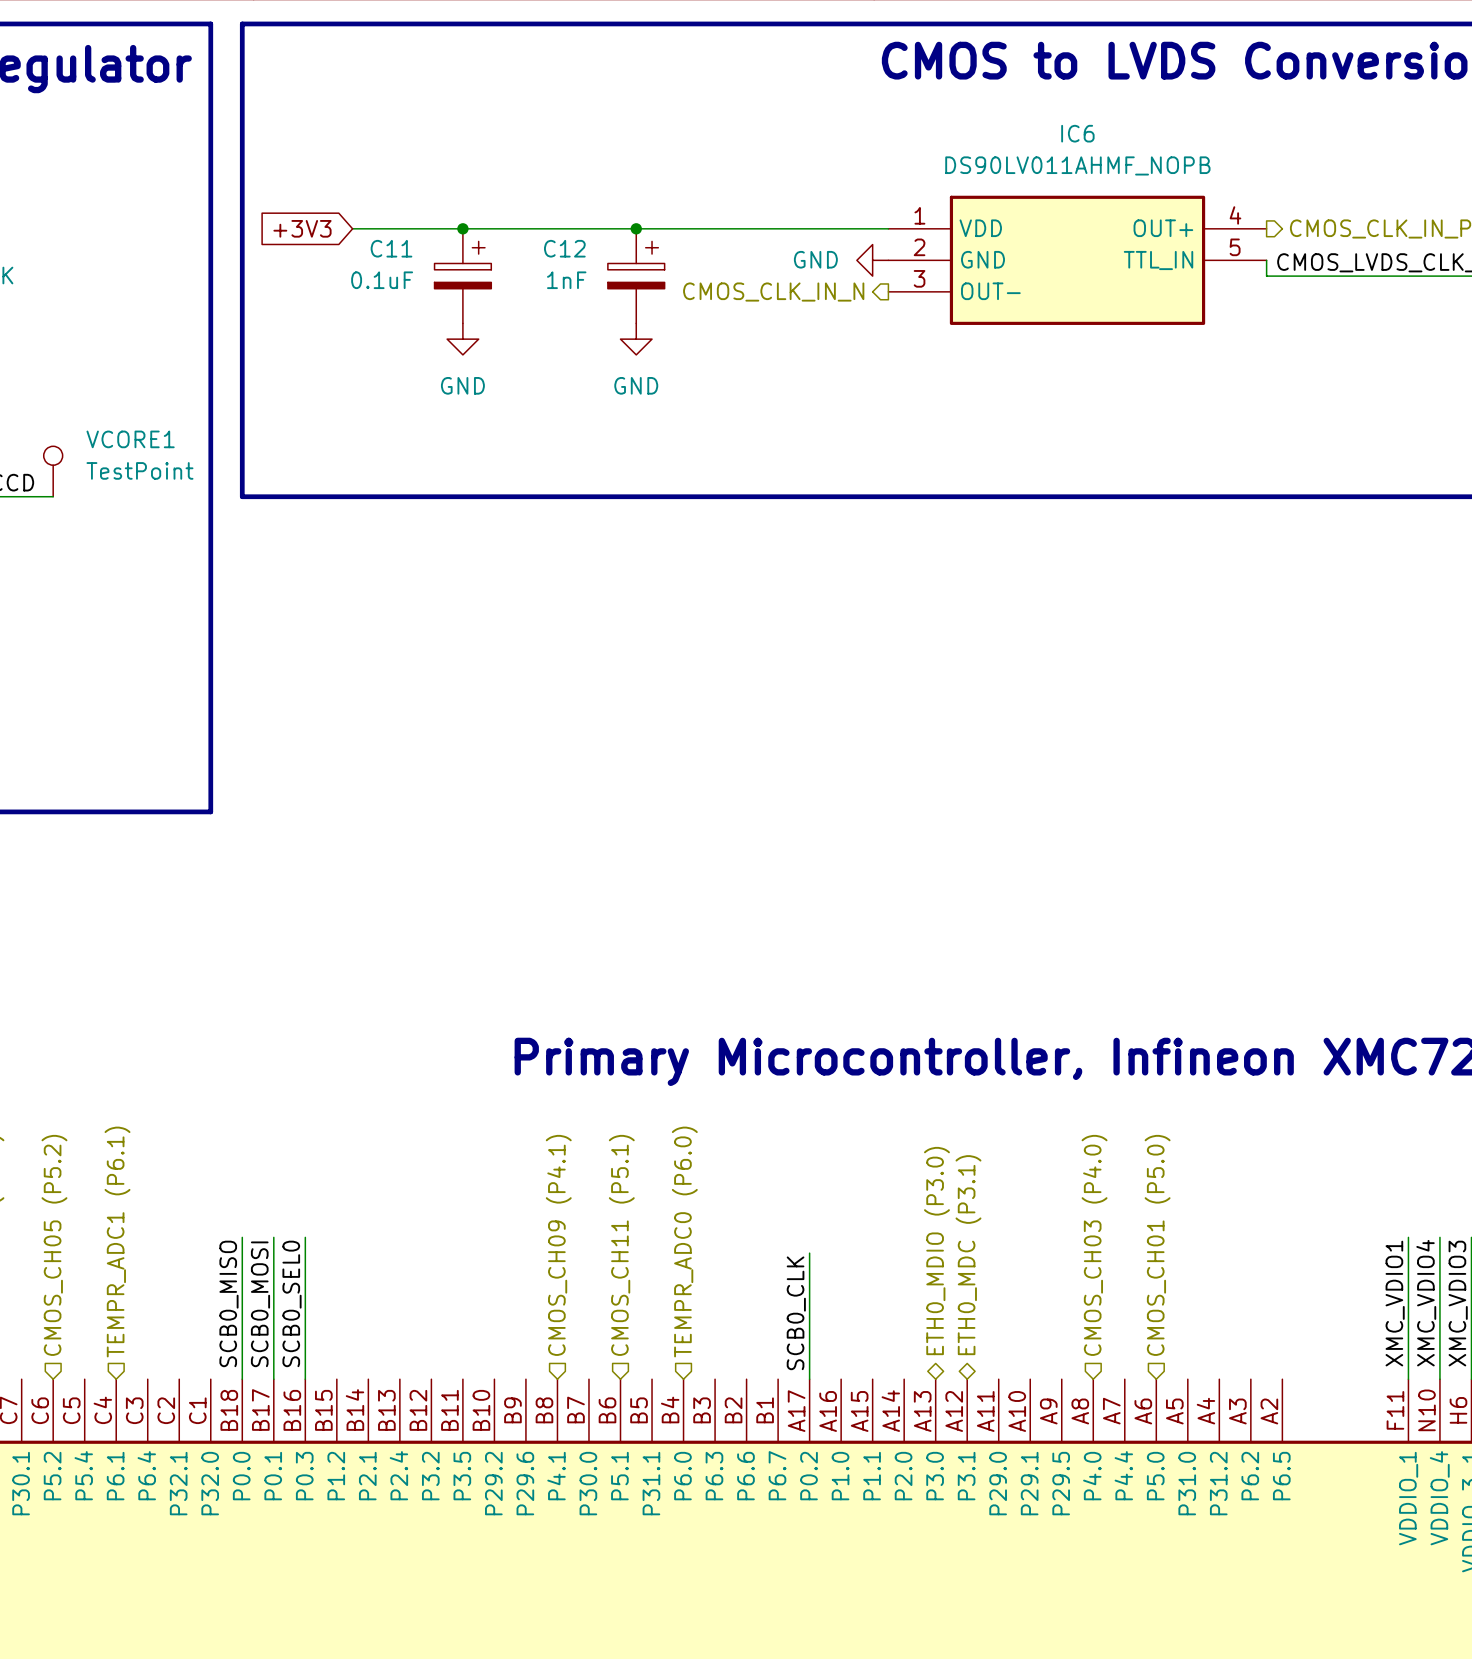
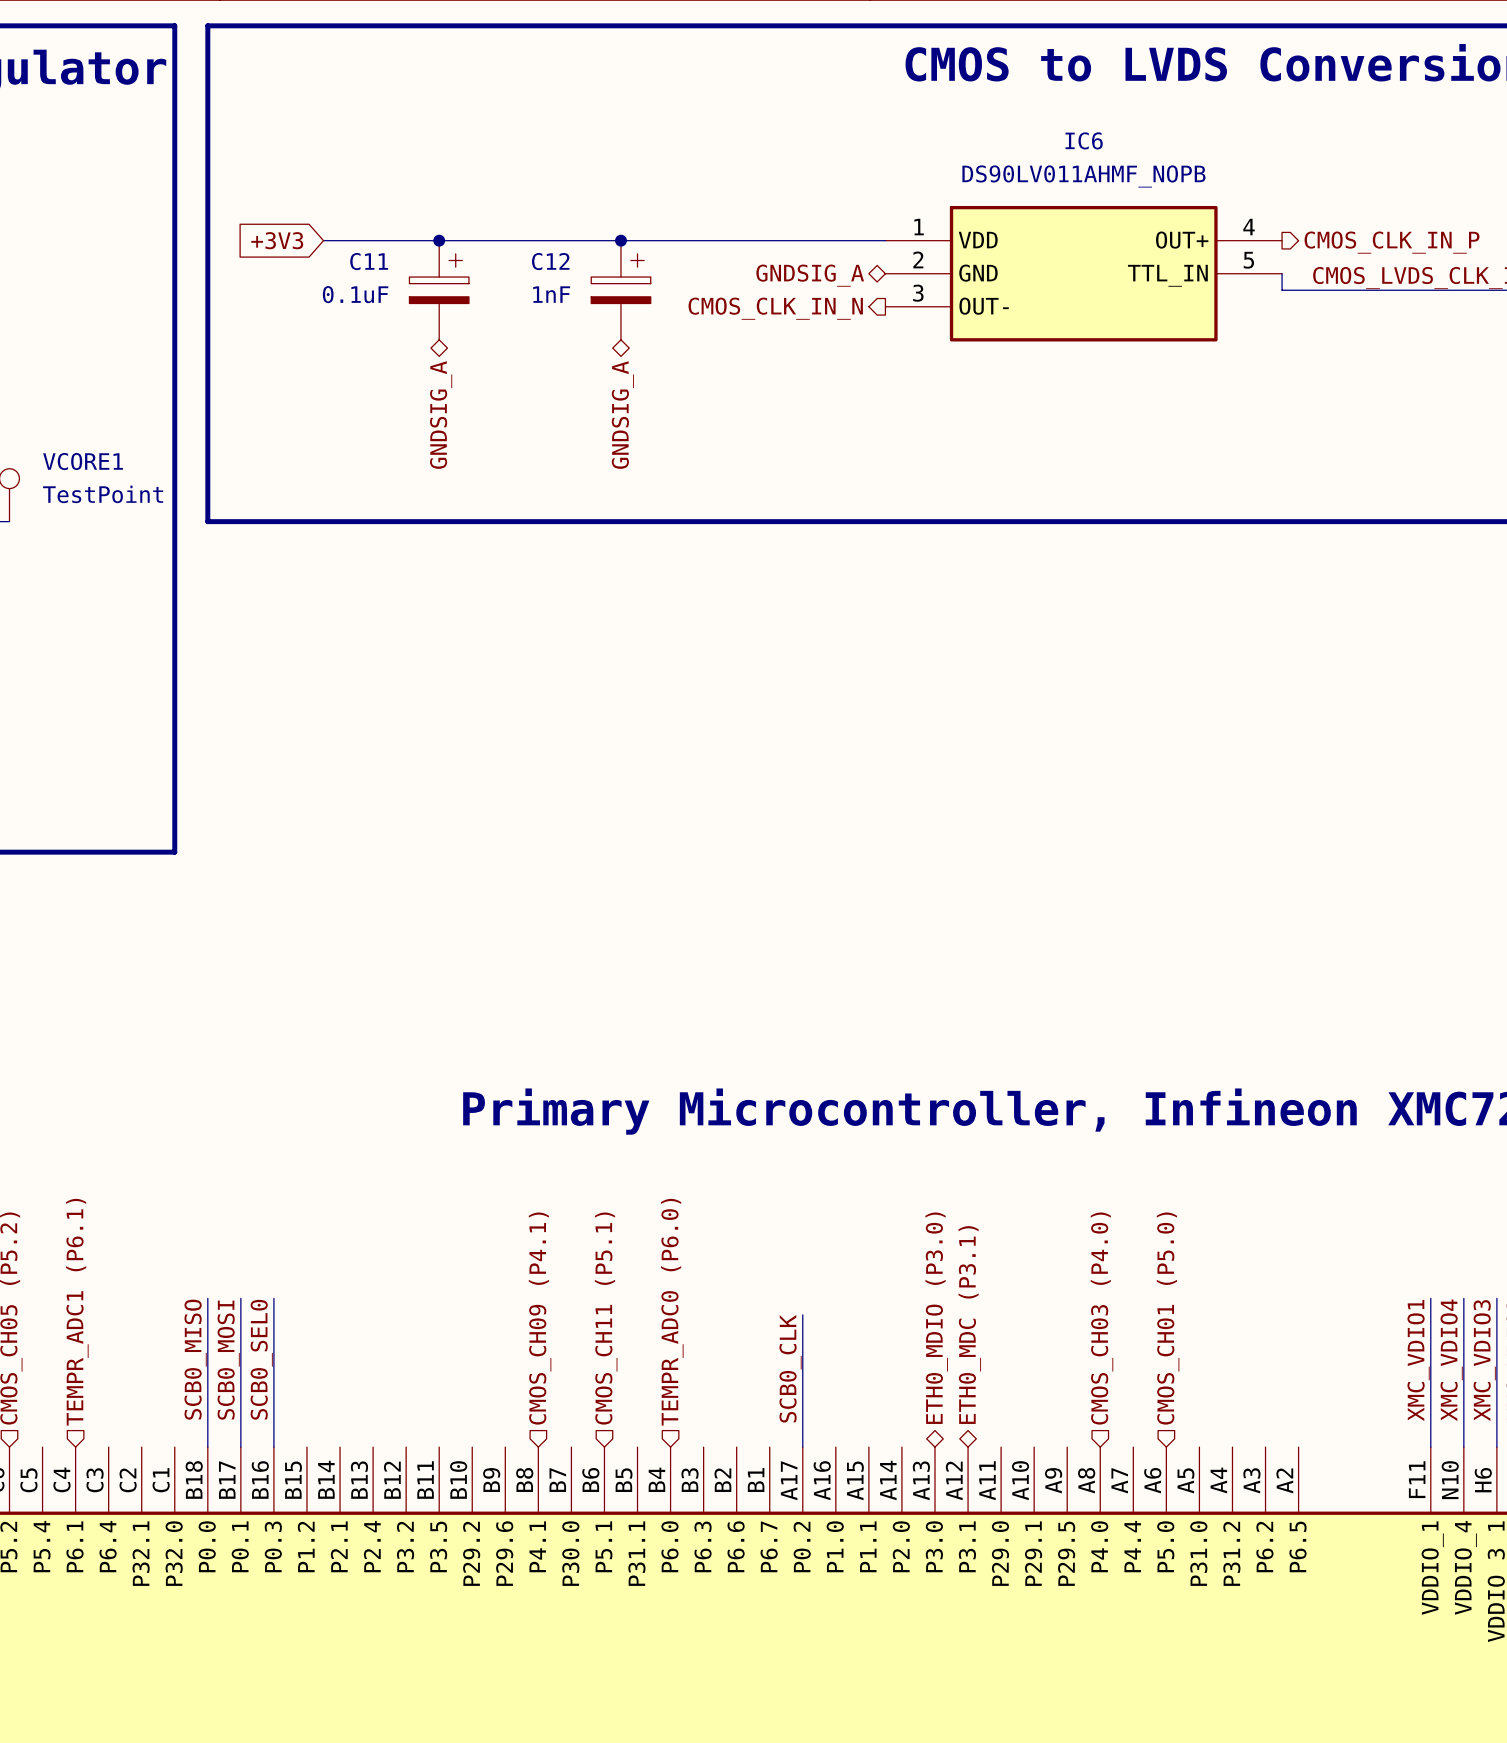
hierarchical label: none -> GNDSIG_A (810, 275)
power symbol: GND (872, 260) -> none
power symbol: GND (462, 339) -> none
power symbol: GND (636, 339) -> none
hierarchical label: none -> GNDSIG_A (441, 415)
hierarchical label: none -> GNDSIG_A (622, 415)

